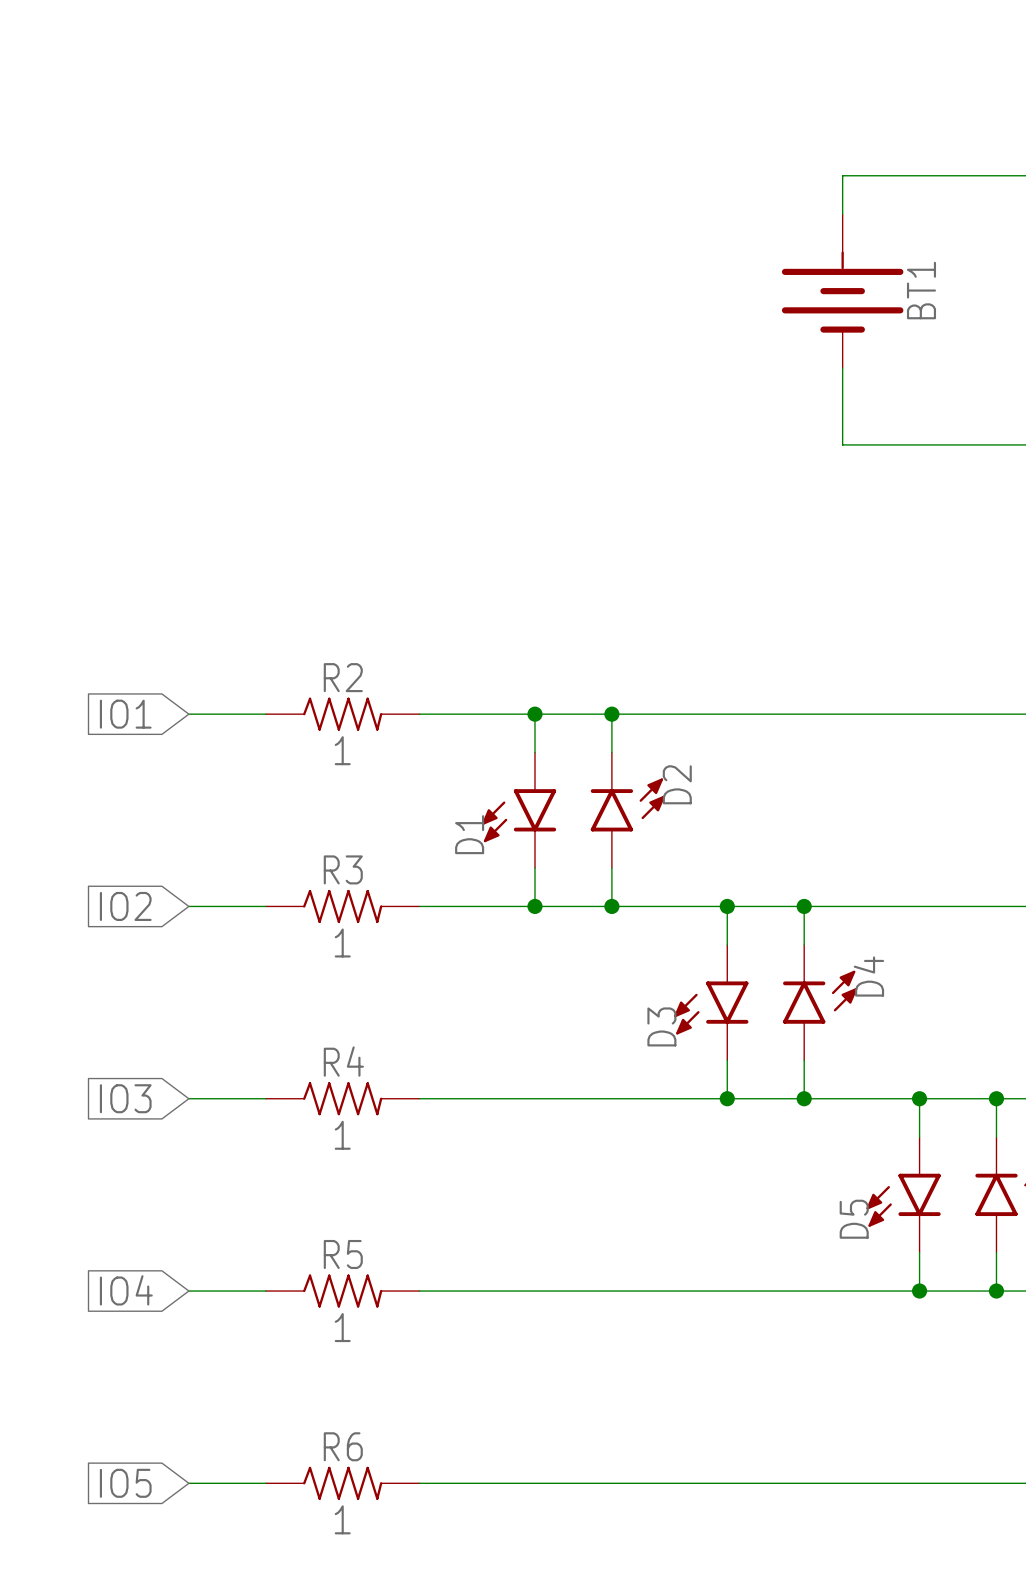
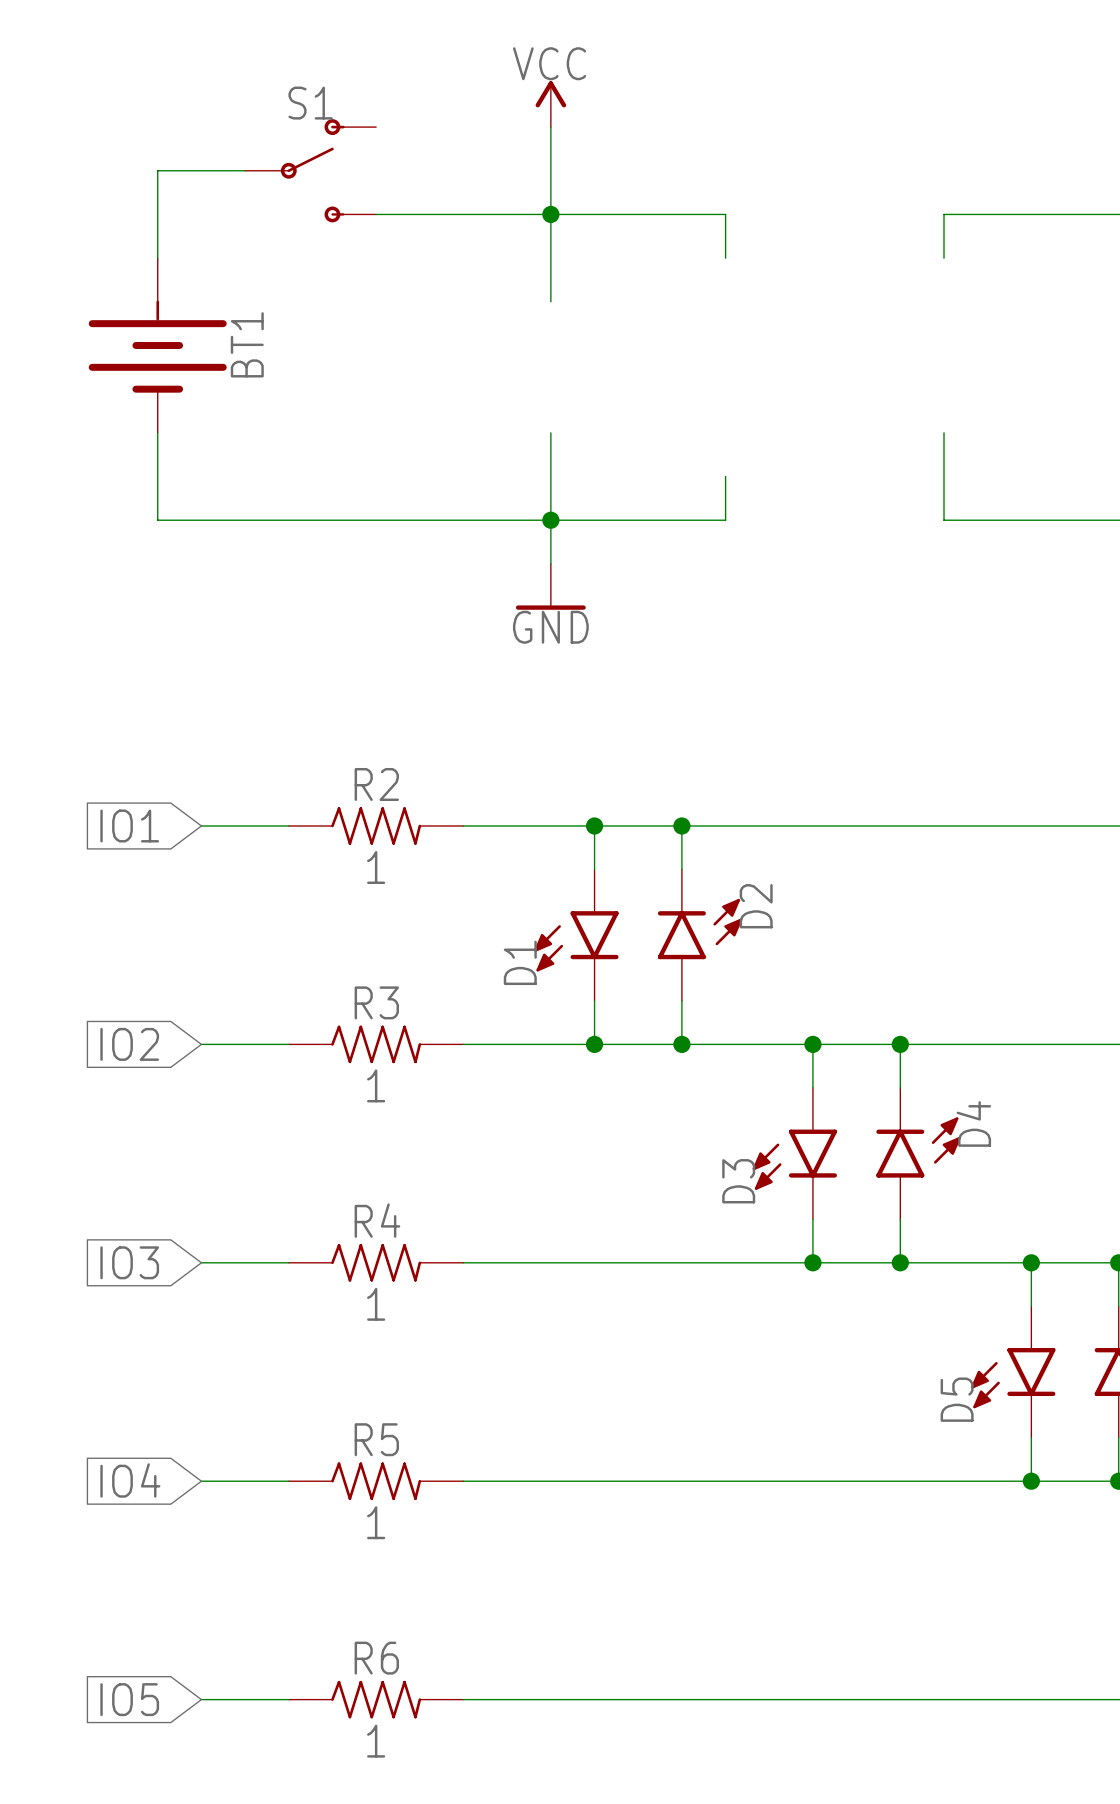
power symbol: none -> VCC (550, 104)
wire: none -> (550, 127) (550, 301)
wire: none -> (245, 170) (157, 170) (157, 258)
S1: none -> (310, 170)
wire: none -> (376, 214) (725, 214) (725, 258)
junction: none -> (550, 214)
BT1 position: (842, 291) -> (157, 345)
wire: none -> (157, 432) (157, 520) (725, 520) (725, 476)
wire: none -> (550, 432) (550, 563)
junction: none -> (550, 520)
power symbol: none -> GND (550, 586)

